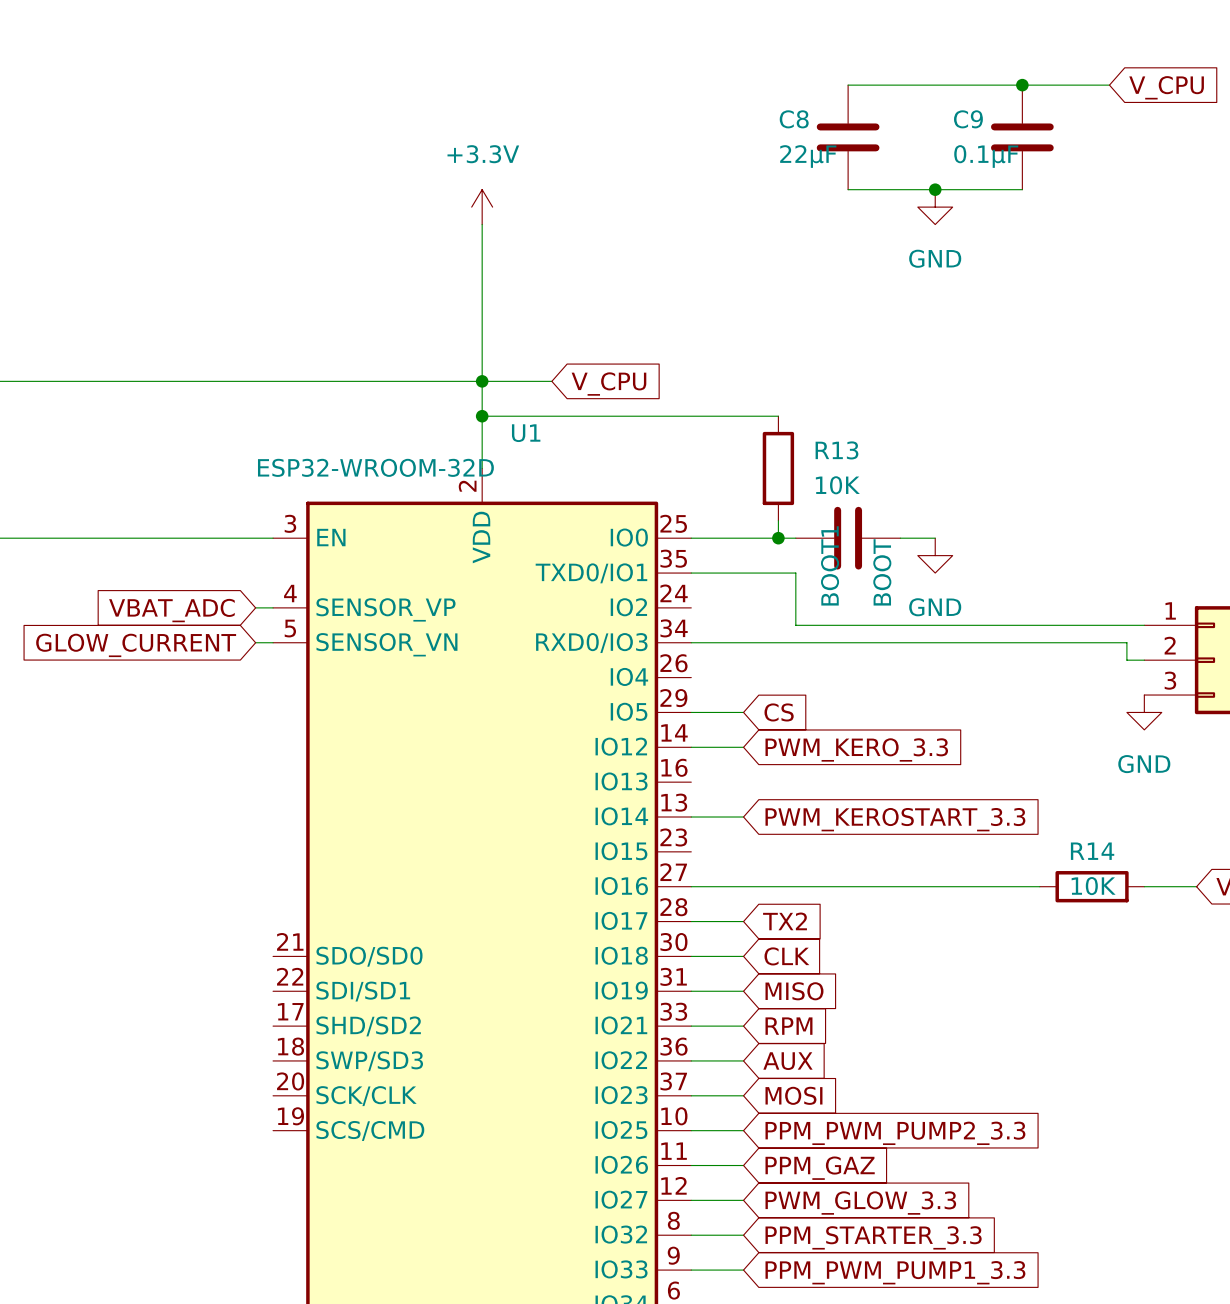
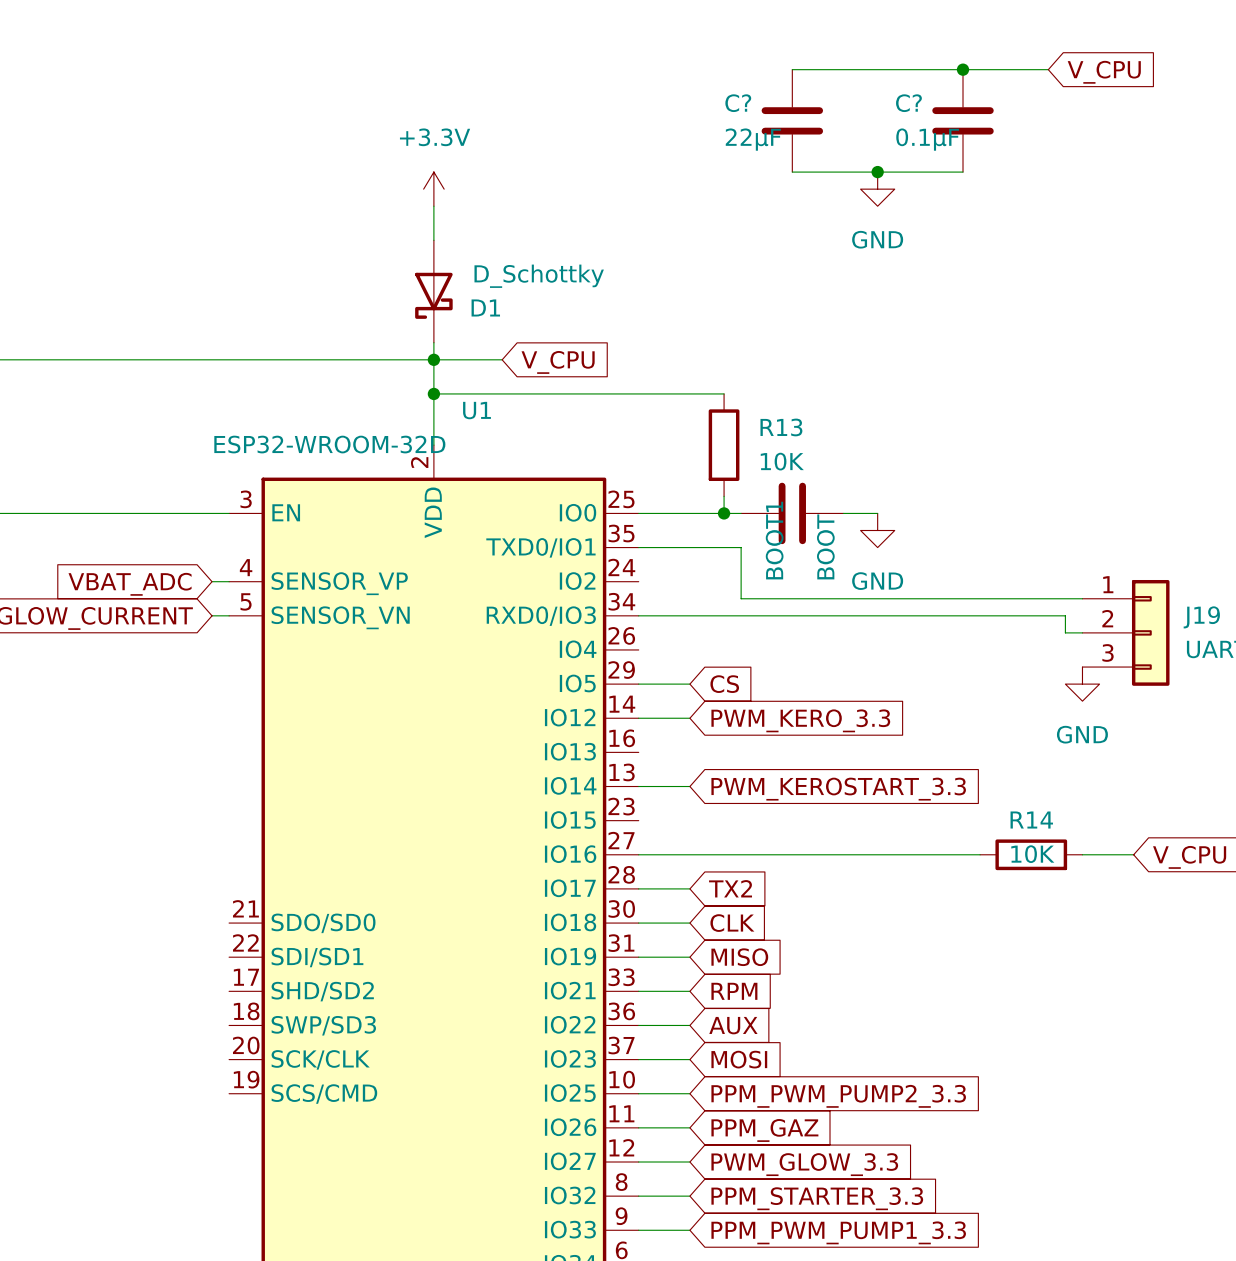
C8 name: C8 (794, 119) -> C? (738, 103)
C9 name: C9 (968, 119) -> C? (908, 103)
D1: none -> D_Schottky (433, 291)

